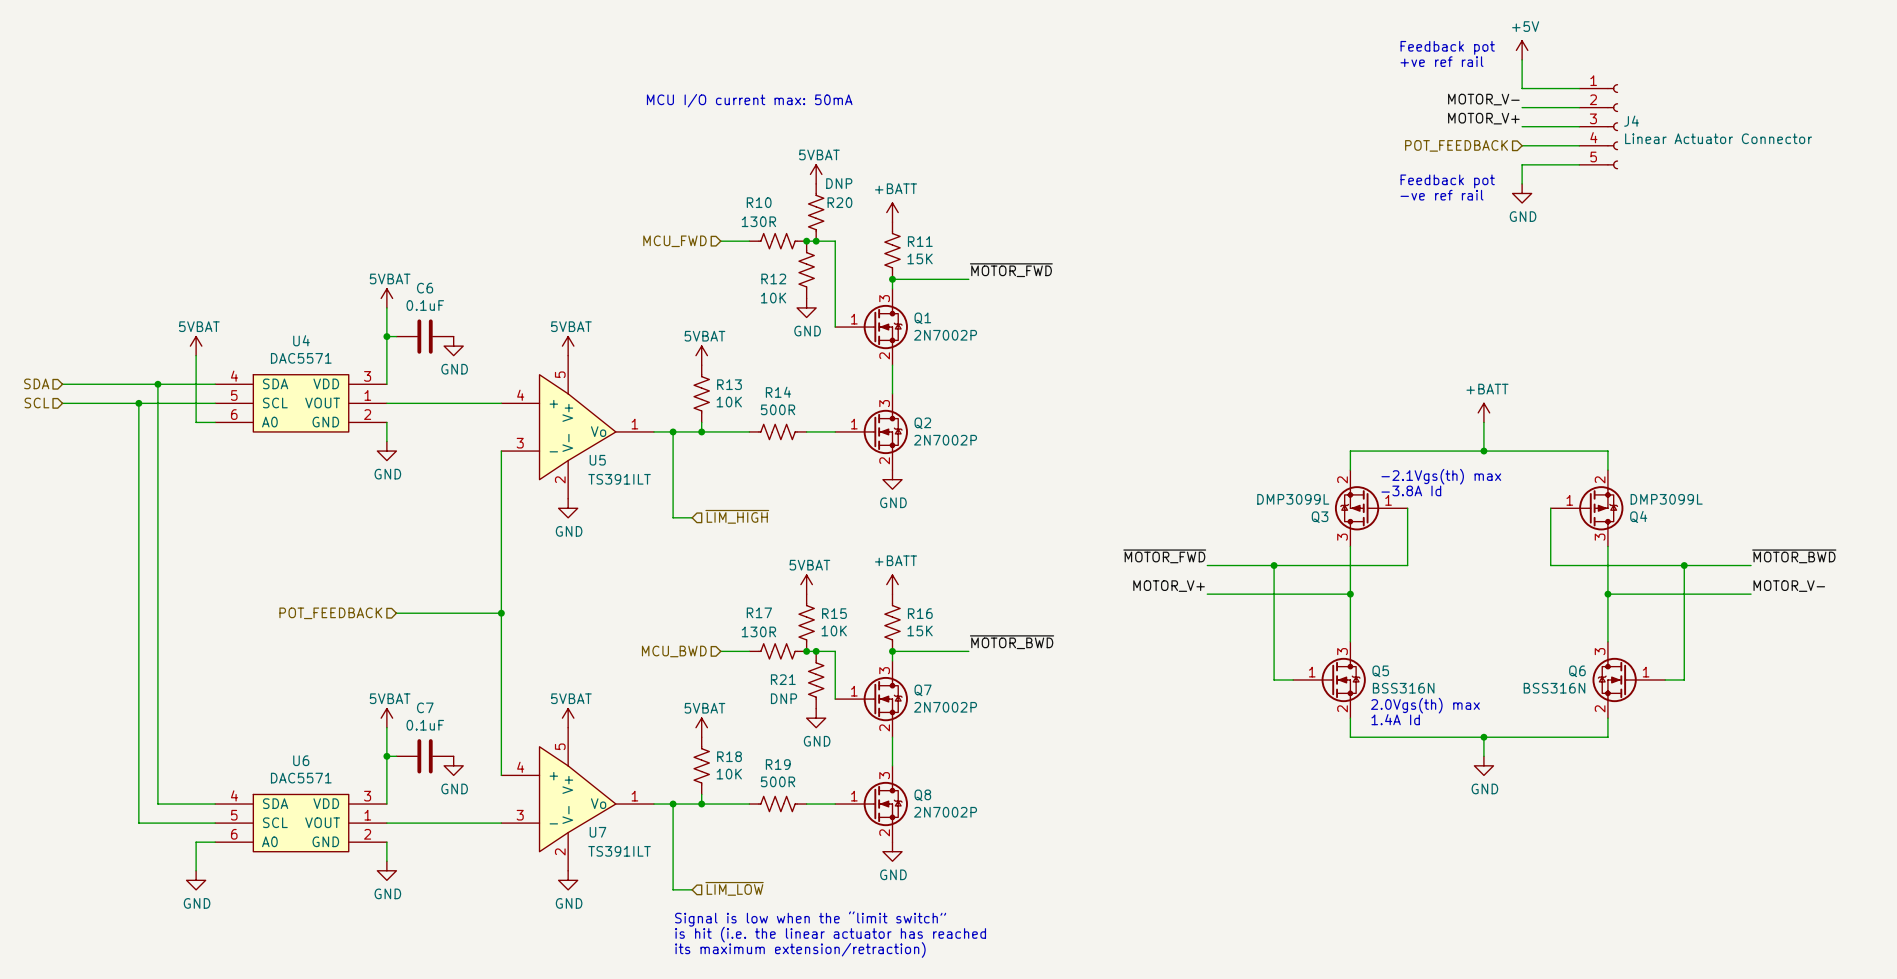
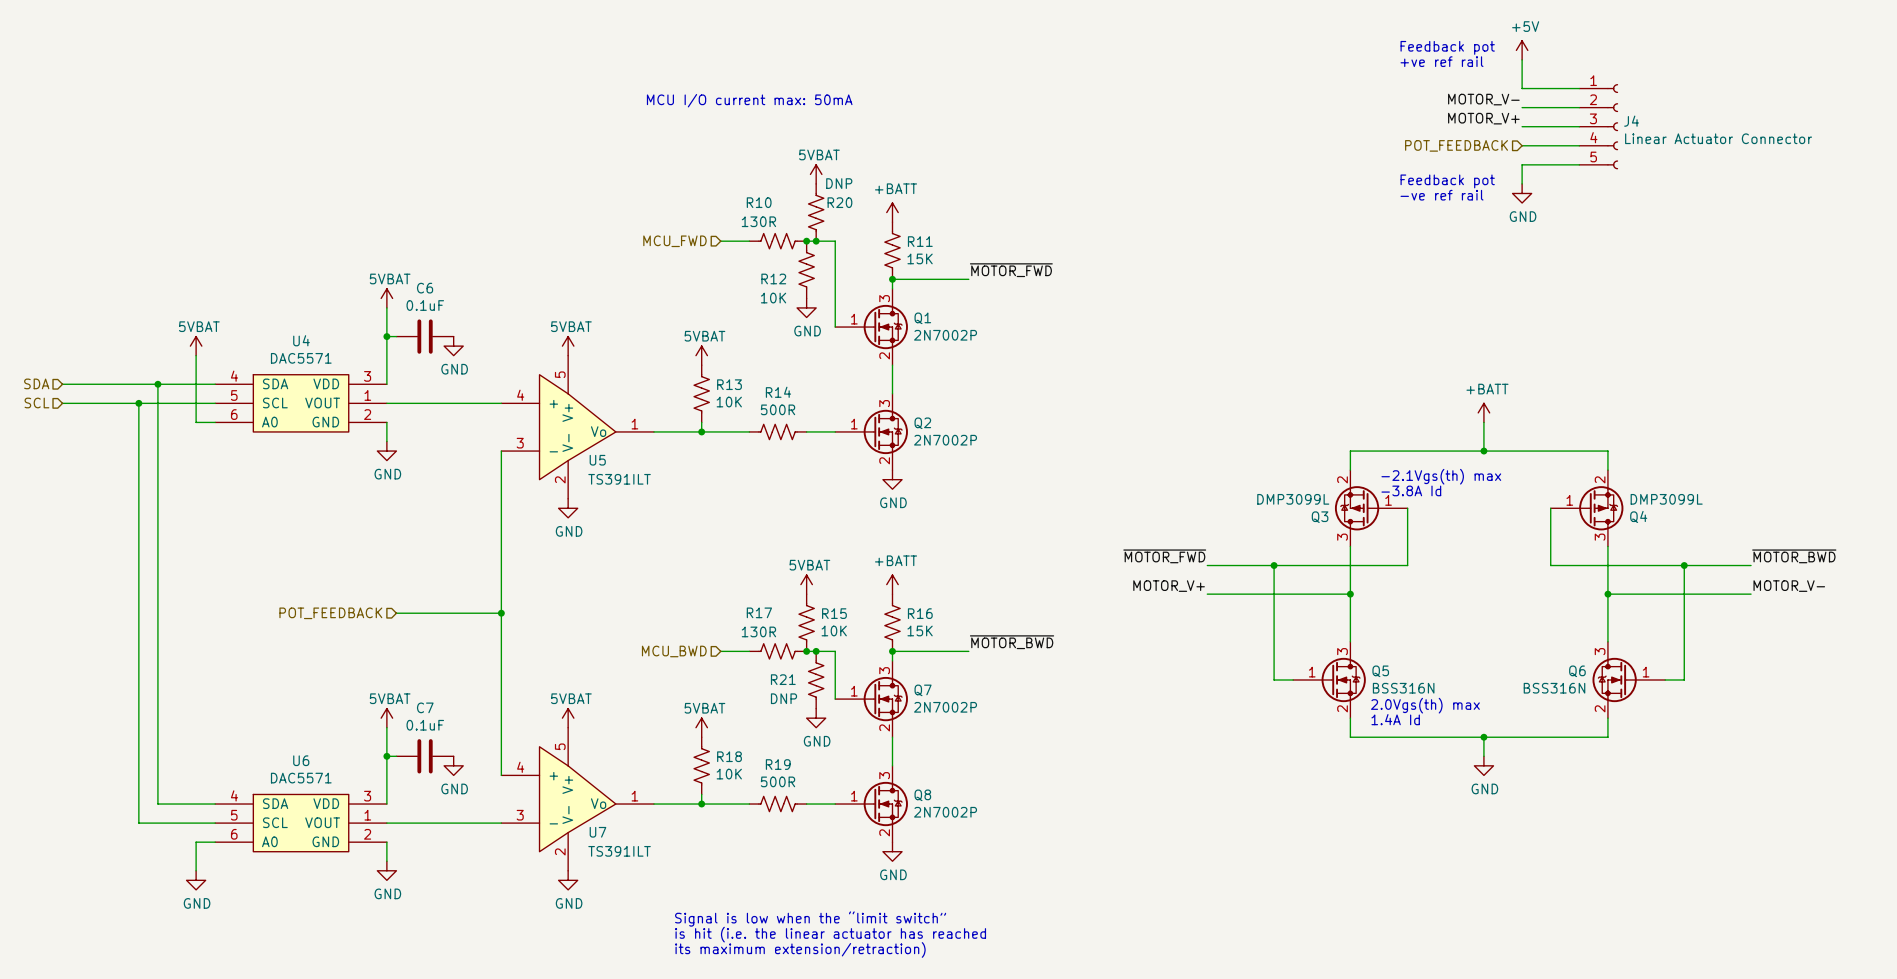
wire: (673, 431) (673, 517) (692, 517) -> none
junction: (673, 431) -> none
hierarchical label: ~{LIM_HIGH} (737, 516) -> none
wire: (673, 804) (673, 889) (692, 889) -> none
junction: (673, 804) -> none
hierarchical label: ~{LIM_LOW} (734, 888) -> none

